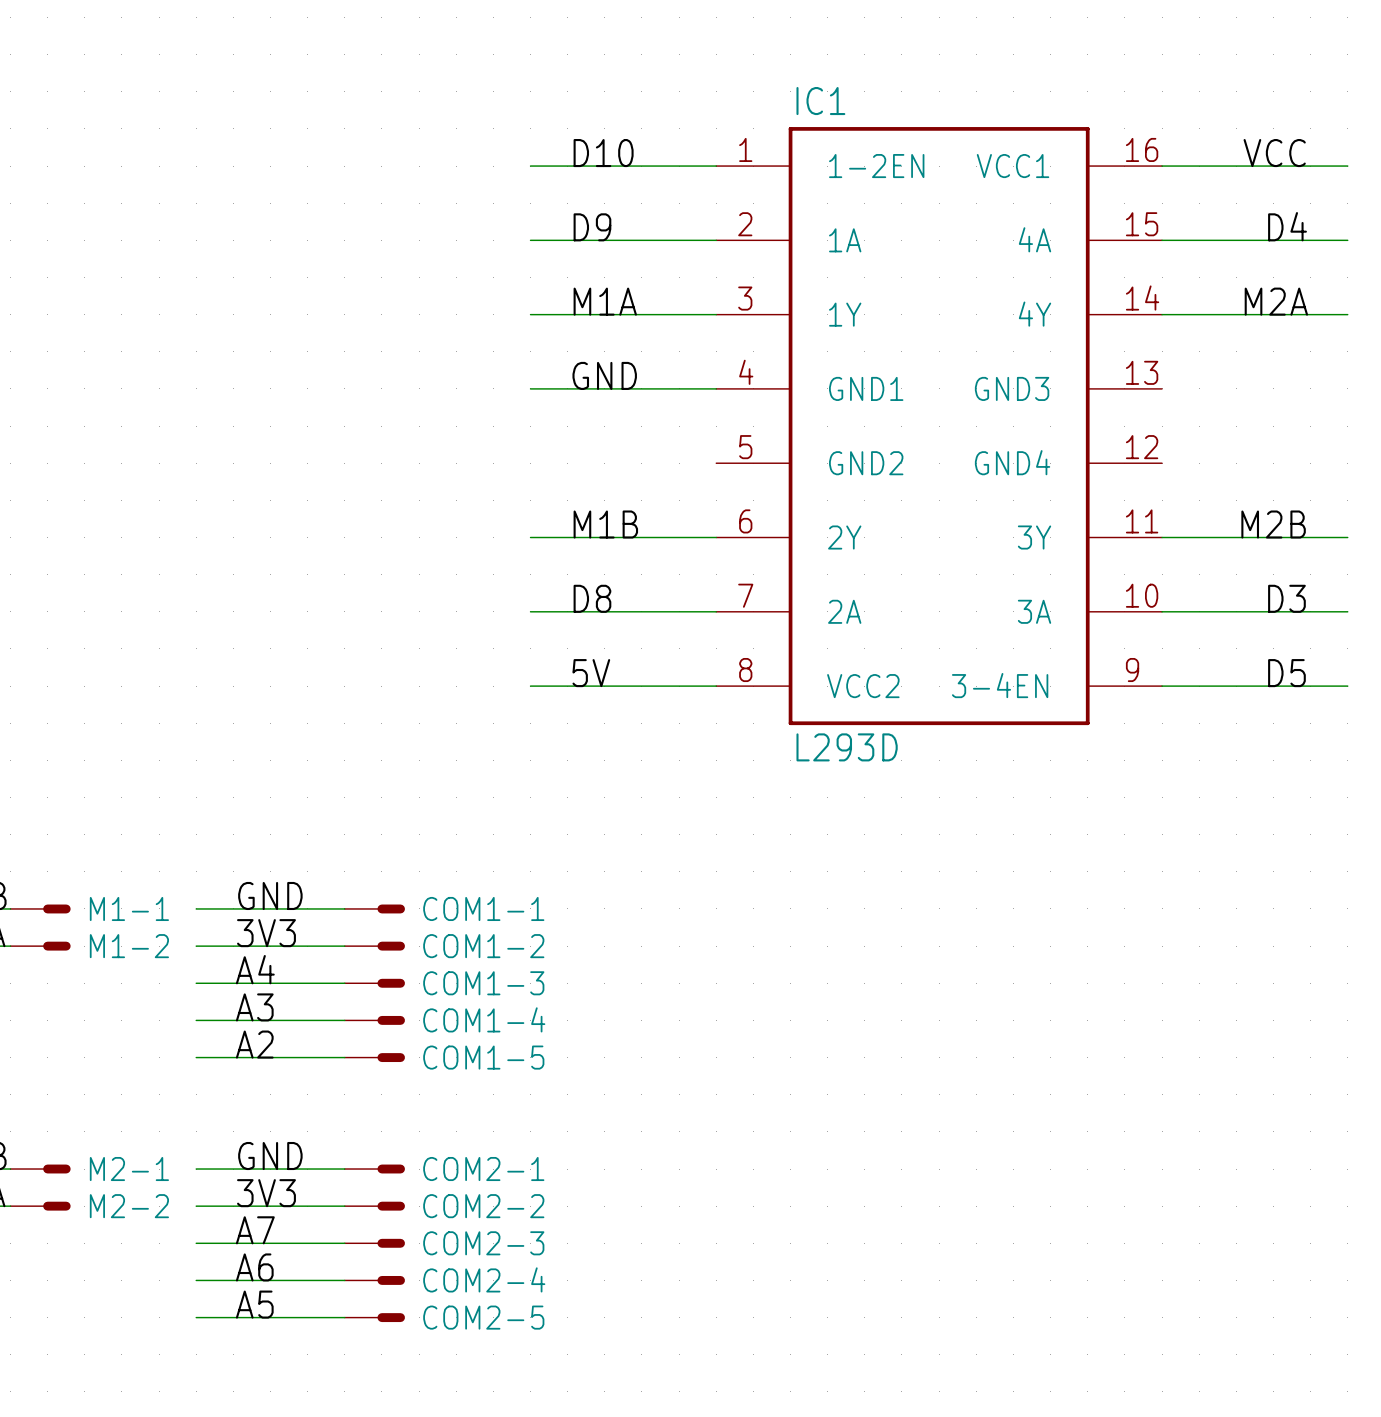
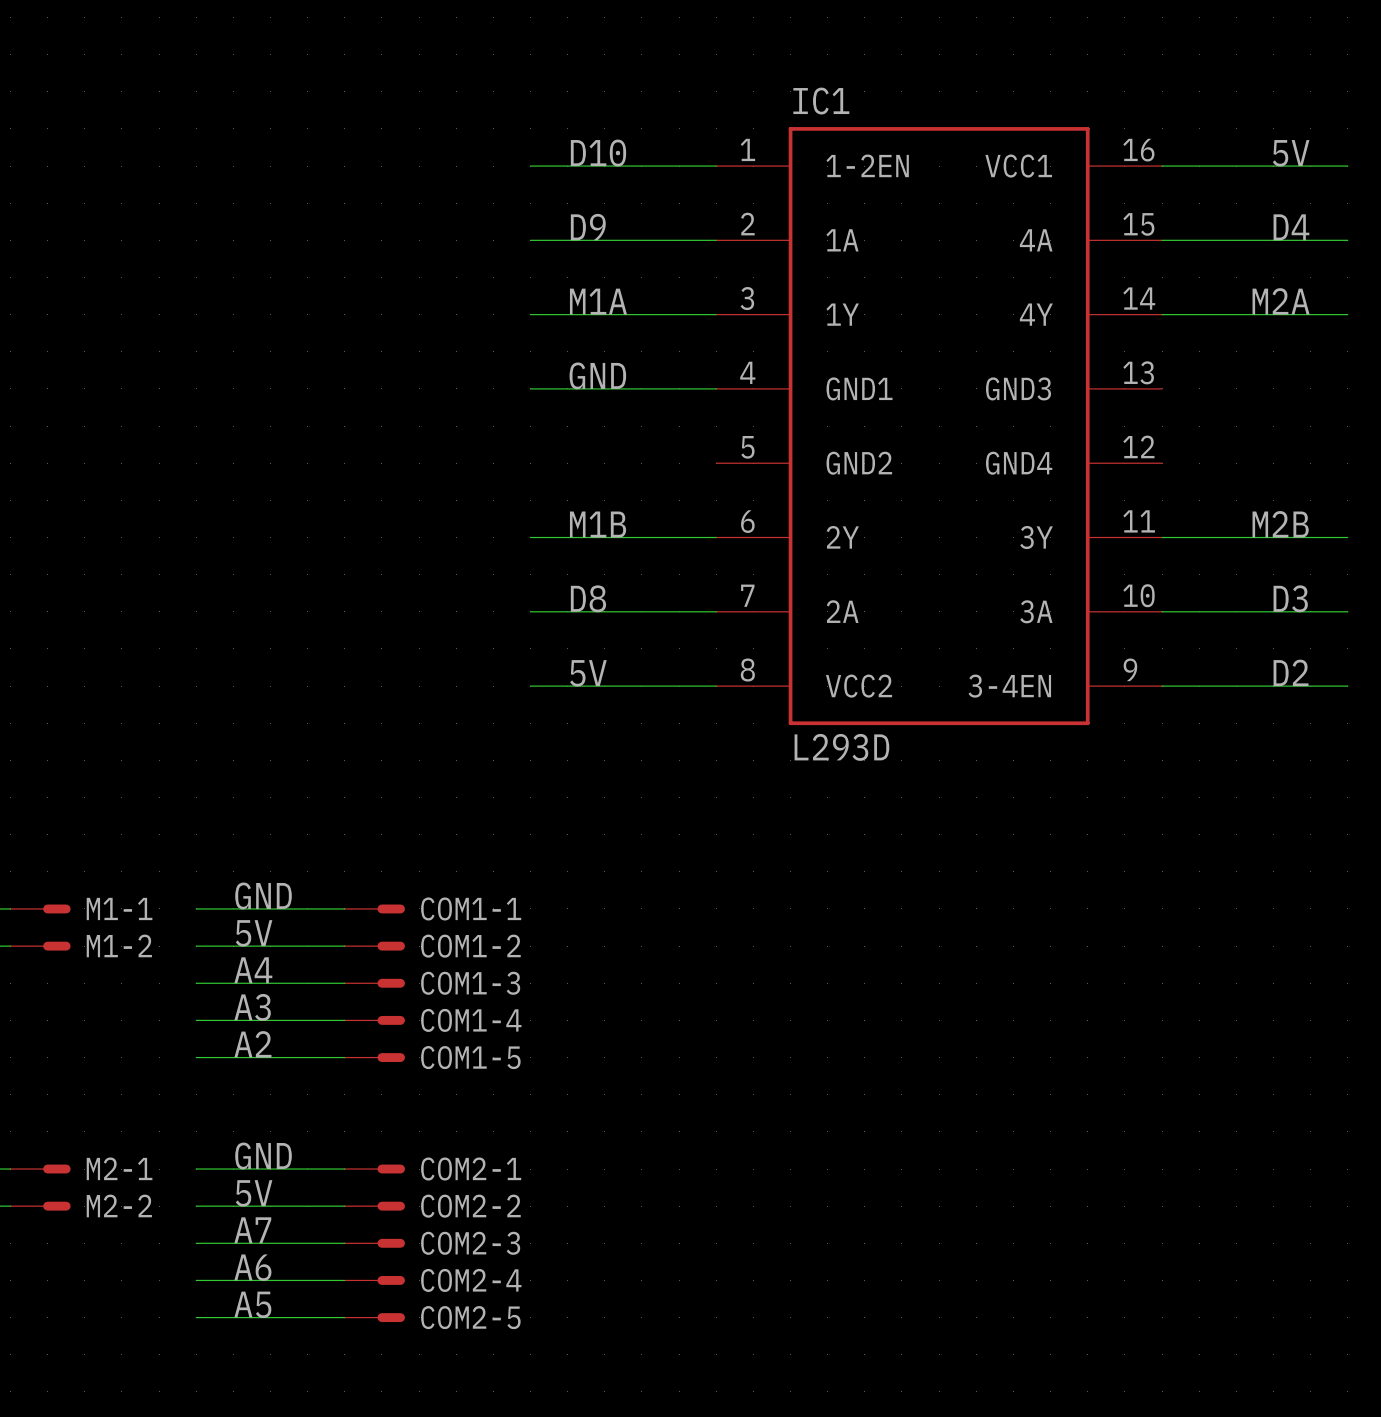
label: VCC (1274, 153) -> 5V (1291, 153)
label: D5 (1286, 673) -> D2 (1291, 672)
label: 3V3 (266, 933) -> 5V (254, 933)
label: 3V3 (266, 1193) -> 5V (254, 1193)

